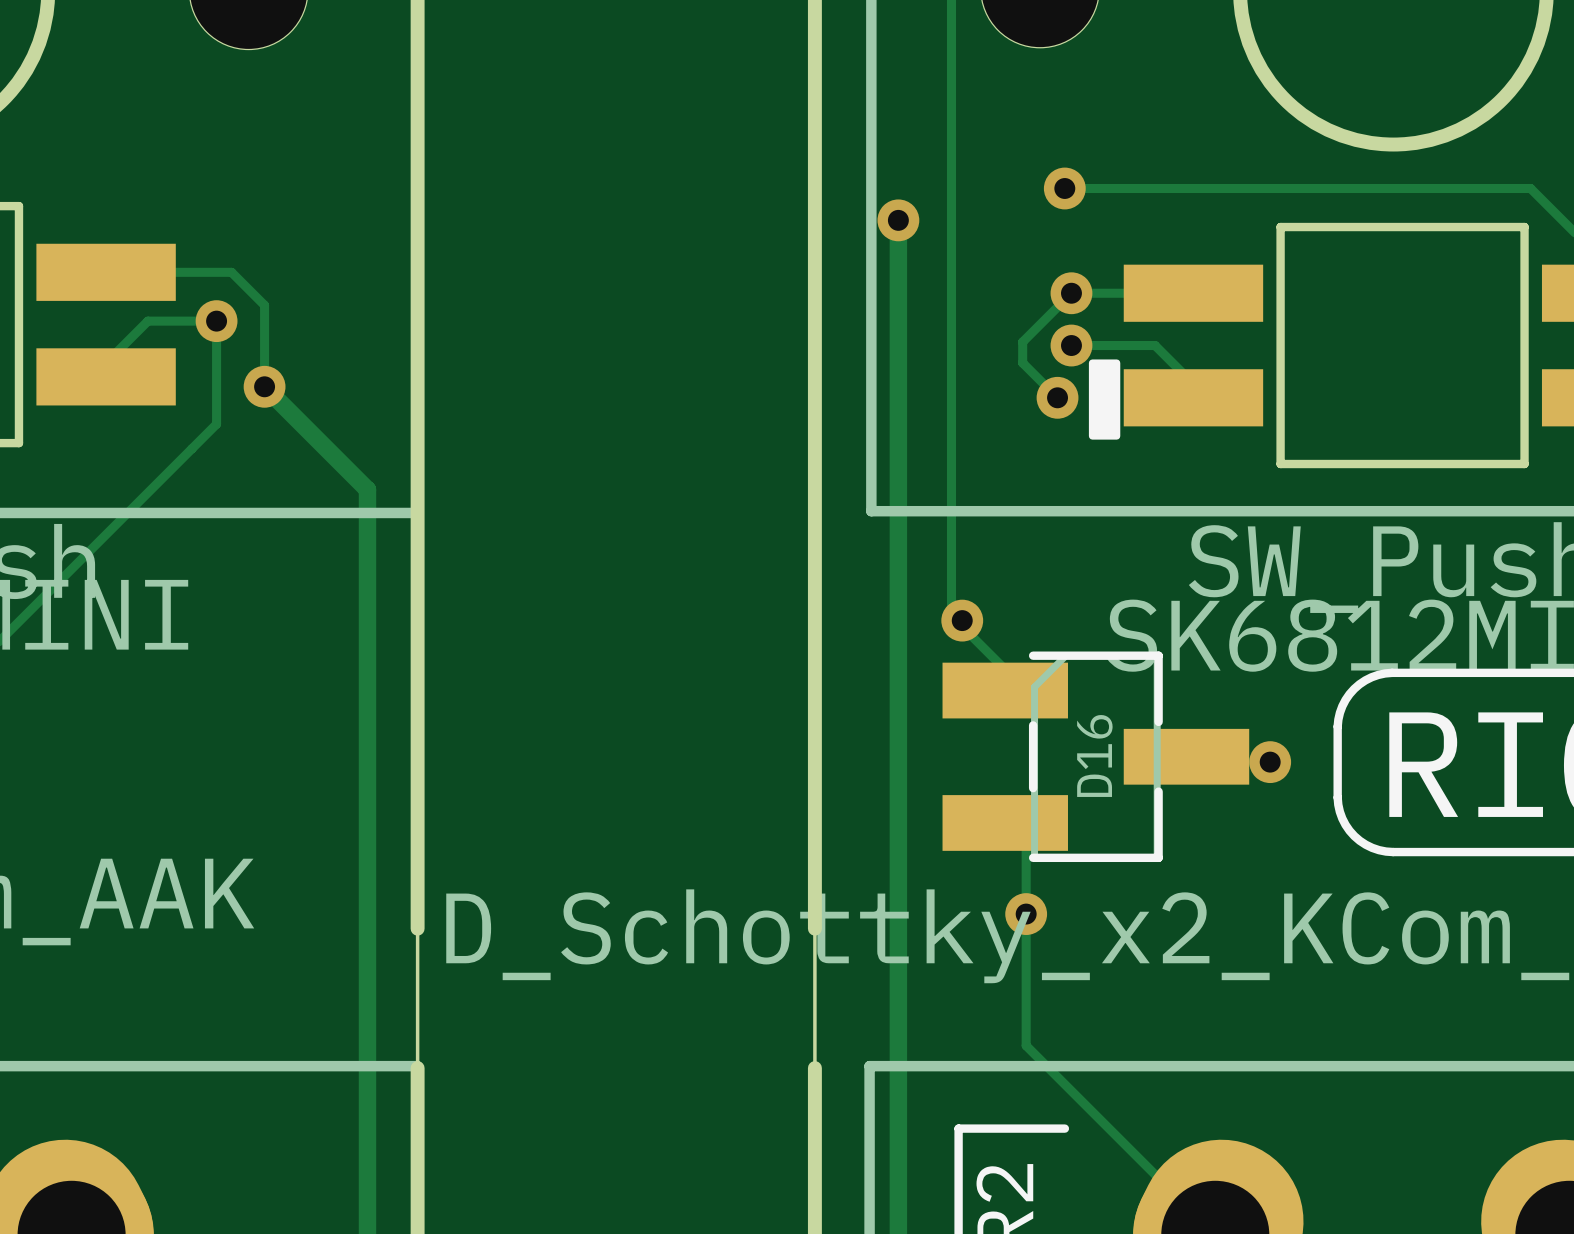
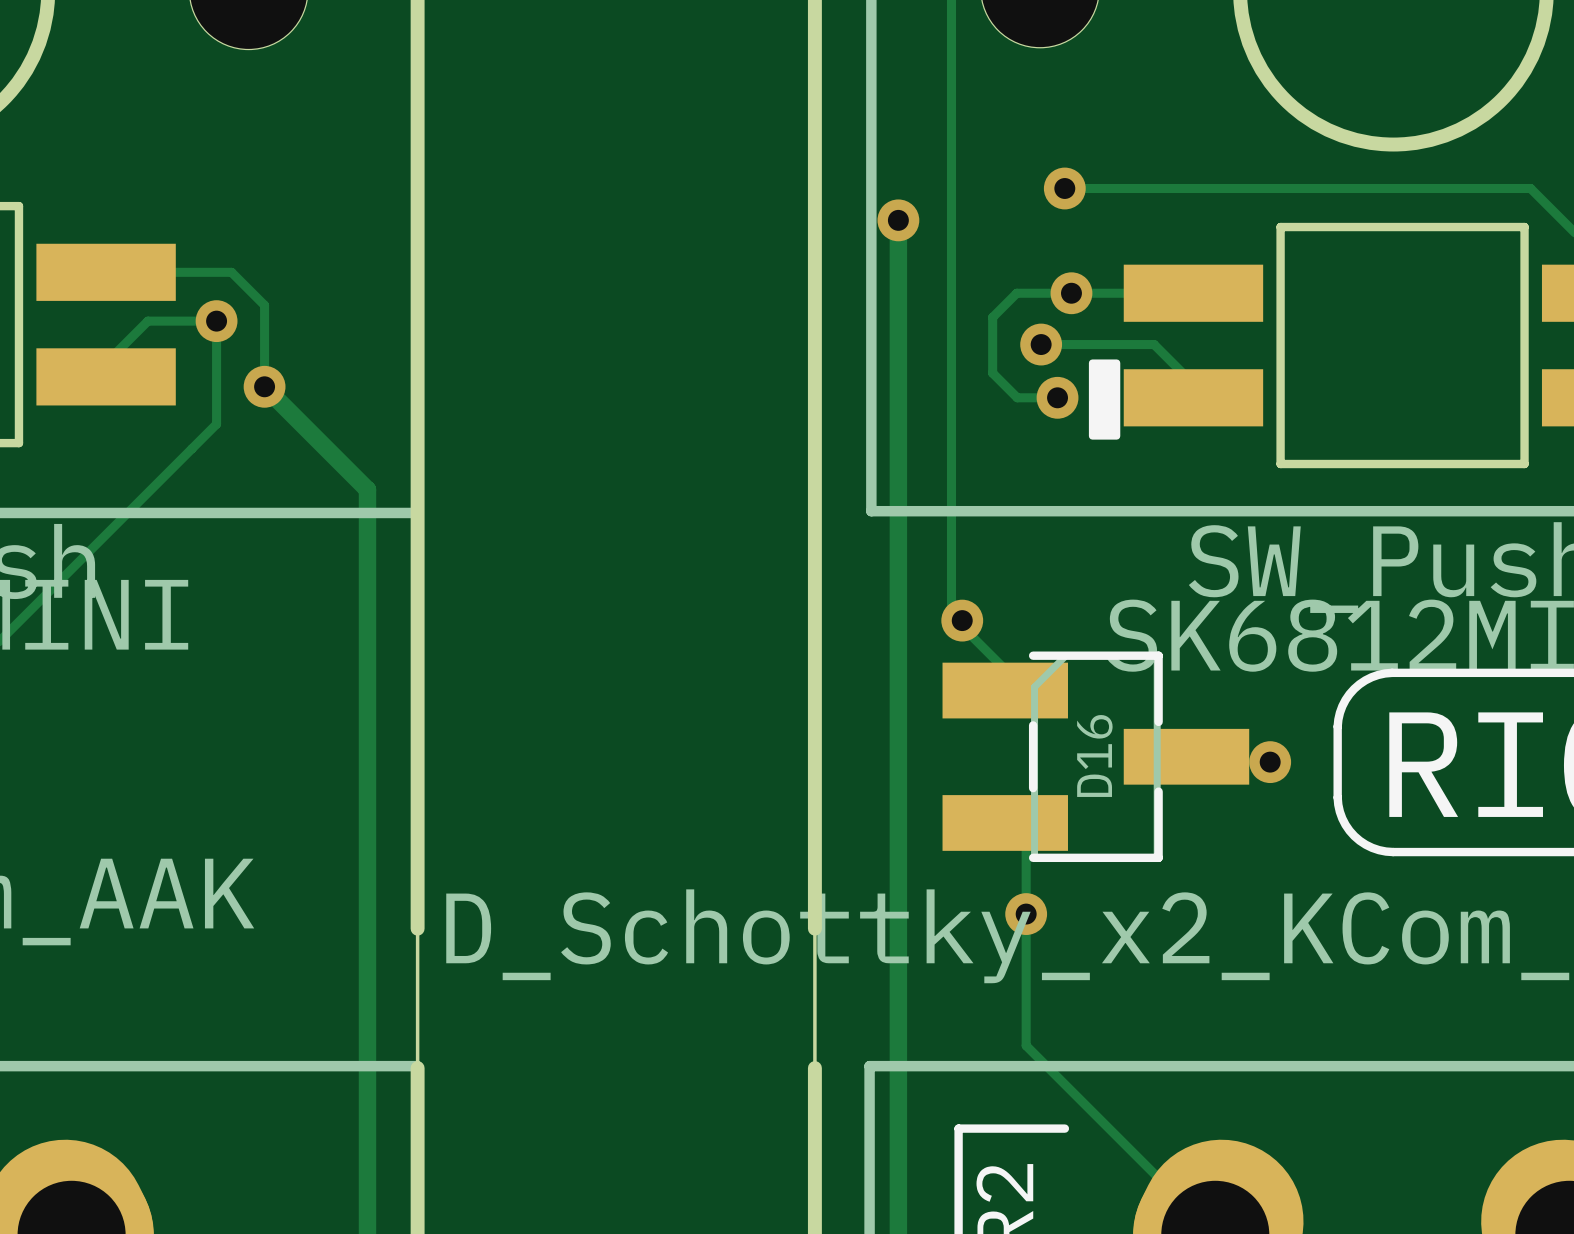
track: (1071, 293) (1022, 342) (1022, 362) (1057, 397) -> (1071, 293) (1016, 293) (992, 317) (992, 373) (1017, 397) (1057, 397)
track: (1071, 345) (1155, 345) -> (1041, 344) (1154, 344)
via position: (1071, 345) -> (1041, 344)

